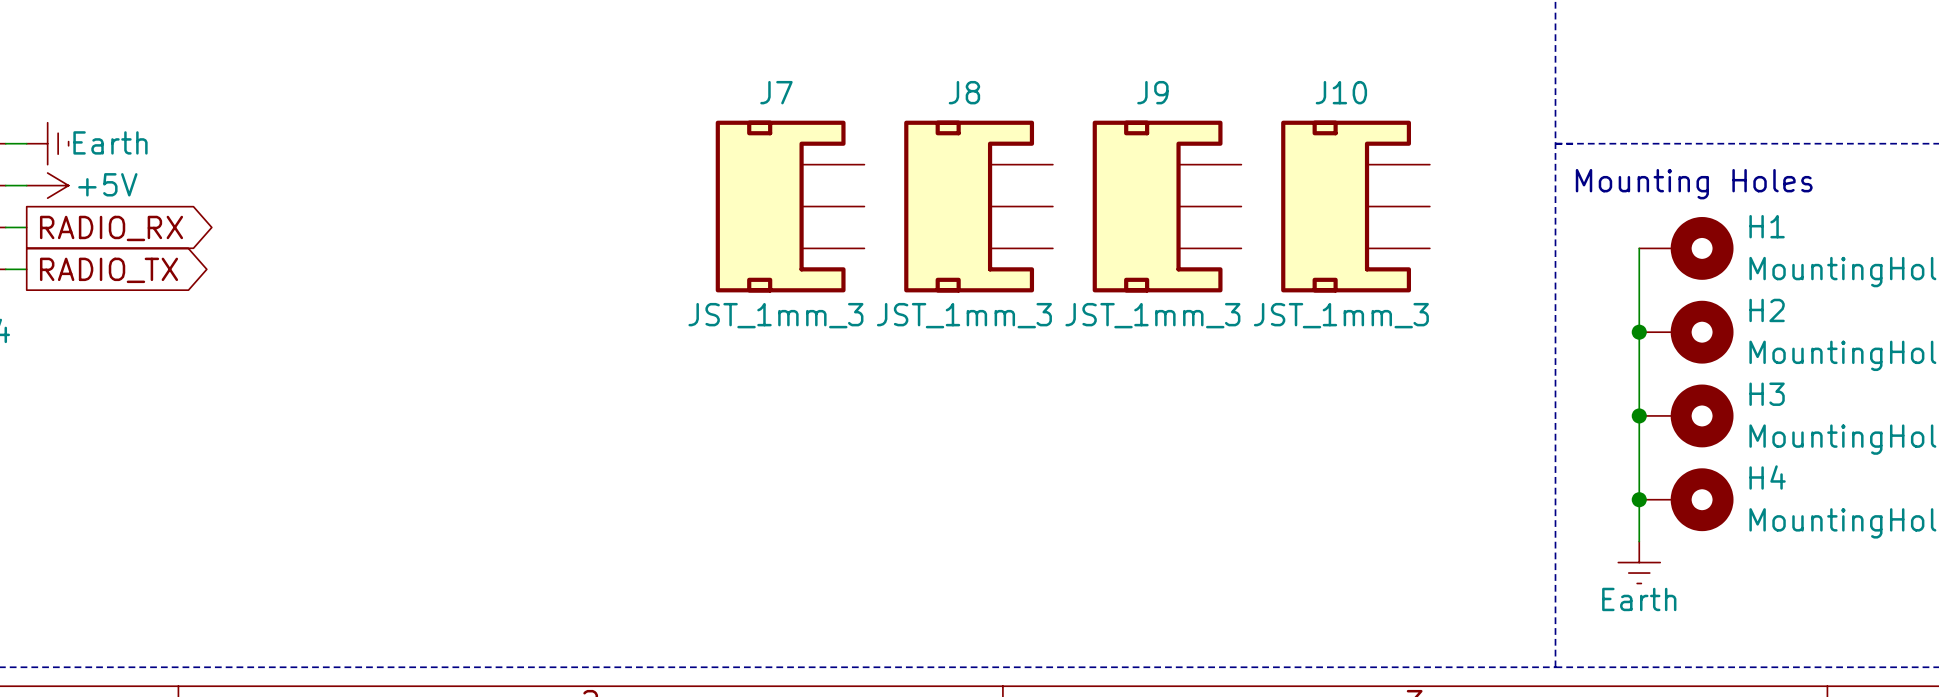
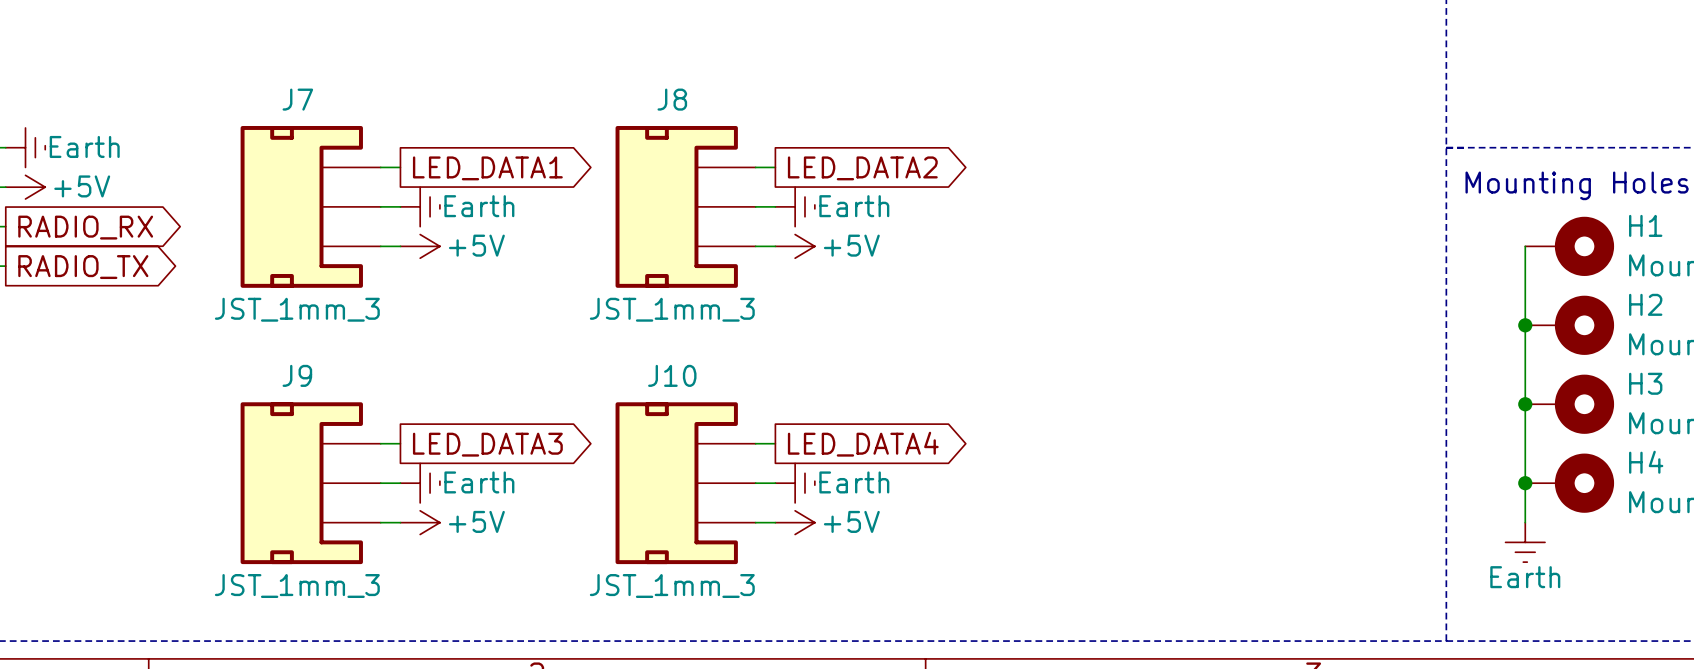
wire: none -> (380, 167) (400, 167)
global label: none -> LED_DATA1 (487, 168)
global label: none -> LED_DATA2 (862, 168)
wire: none -> (380, 206) (400, 206)
power symbol: none -> Earth (420, 206)
J7 position: (790, 206) -> (310, 206)
power symbol: none -> Earth (795, 206)
J8 position: (978, 206) -> (685, 206)
J9 position: (1167, 206) -> (310, 483)
J10 position: (1355, 206) -> (685, 483)
wire: none -> (380, 246) (400, 246)
power symbol: none -> +5V (420, 246)
power symbol: none -> +5V (795, 246)
wire: none -> (380, 443) (400, 443)
wire: none -> (755, 443) (775, 443)
global label: none -> LED_DATA3 (487, 444)
global label: none -> LED_DATA4 (863, 444)
wire: none -> (380, 483) (400, 483)
power symbol: none -> Earth (420, 483)
wire: none -> (755, 483) (775, 483)
power symbol: none -> Earth (795, 483)
wire: none -> (380, 522) (400, 522)
power symbol: none -> +5V (420, 522)
wire: none -> (755, 522) (775, 522)
power symbol: none -> +5V (795, 522)

